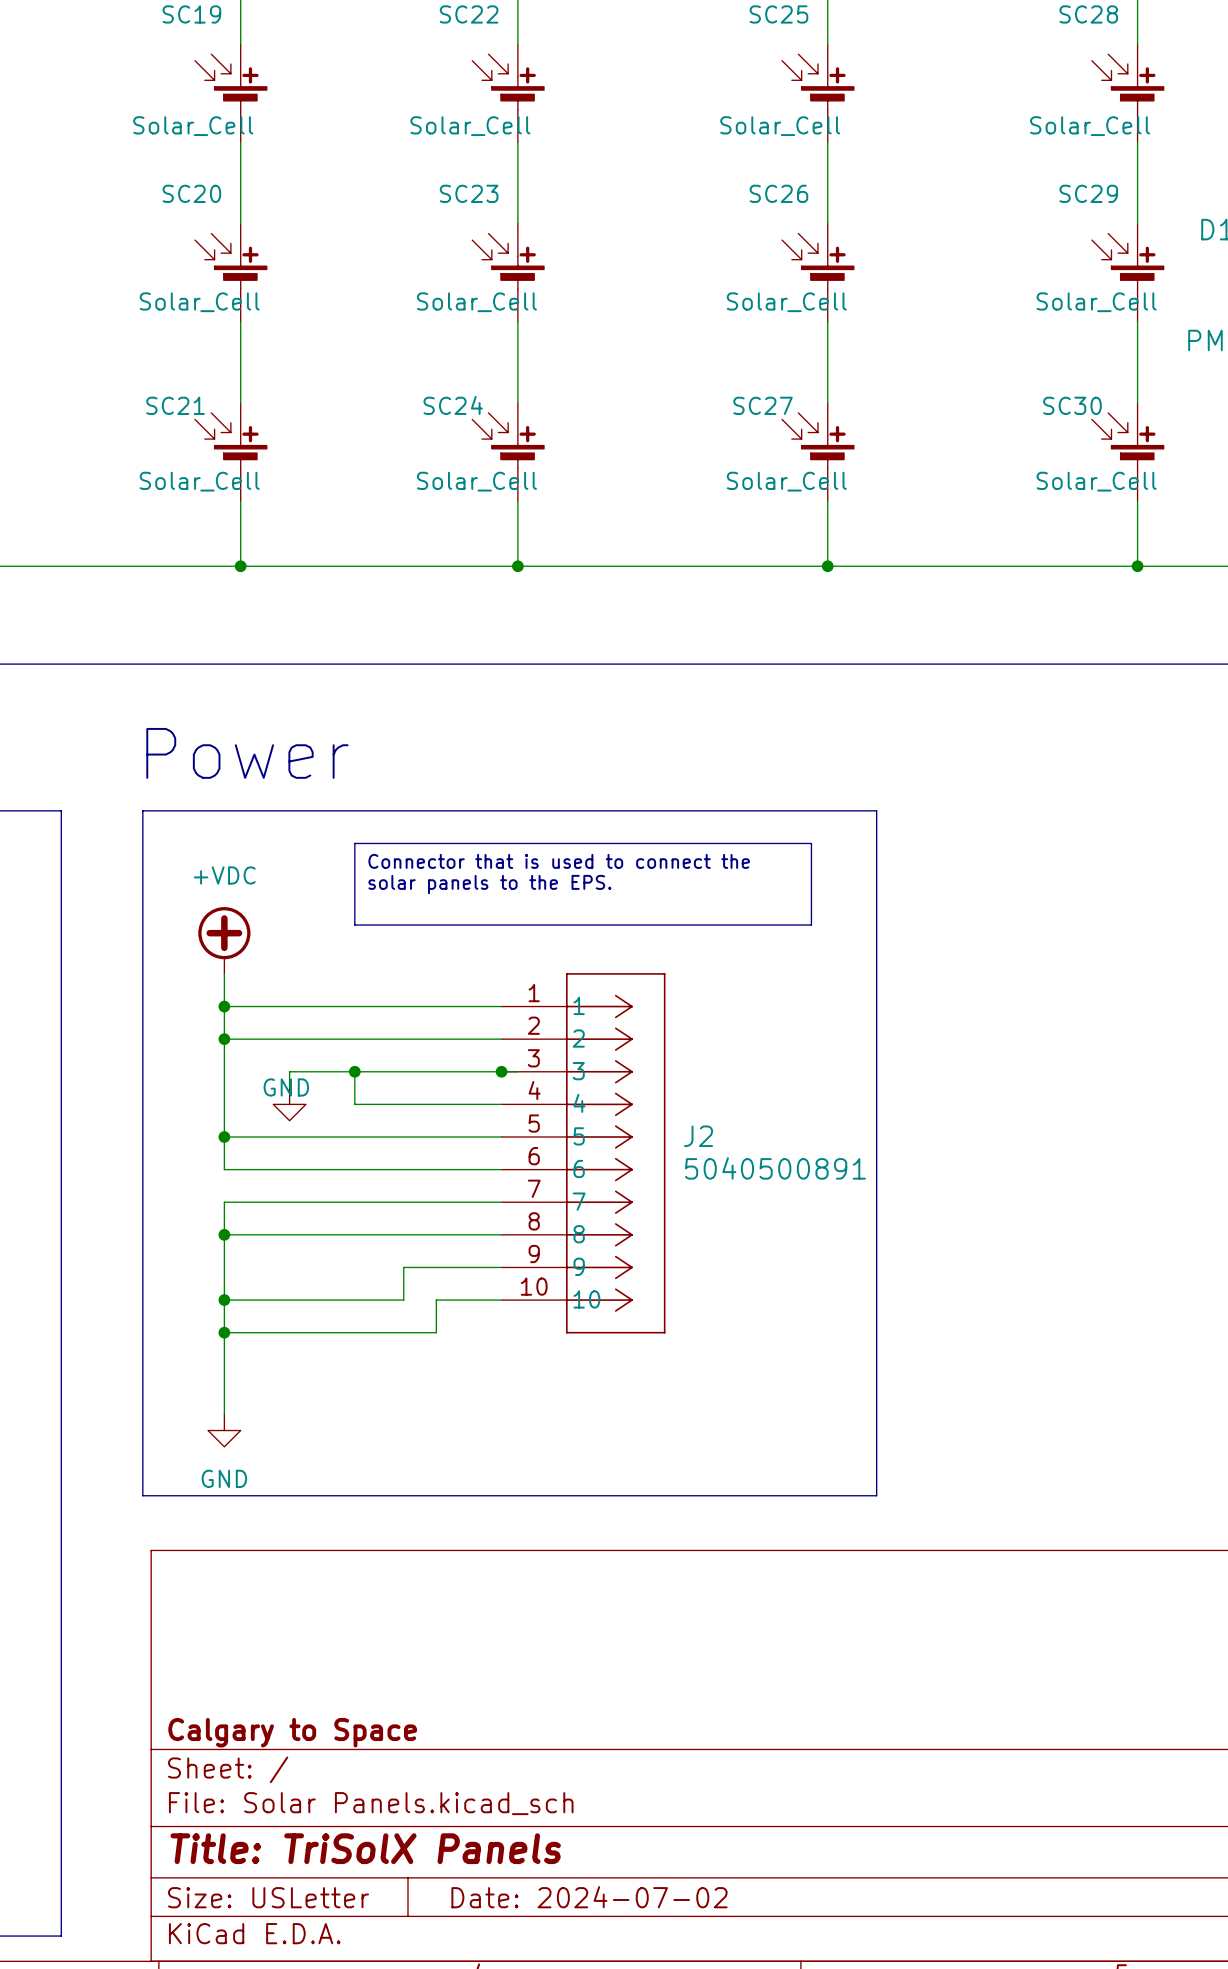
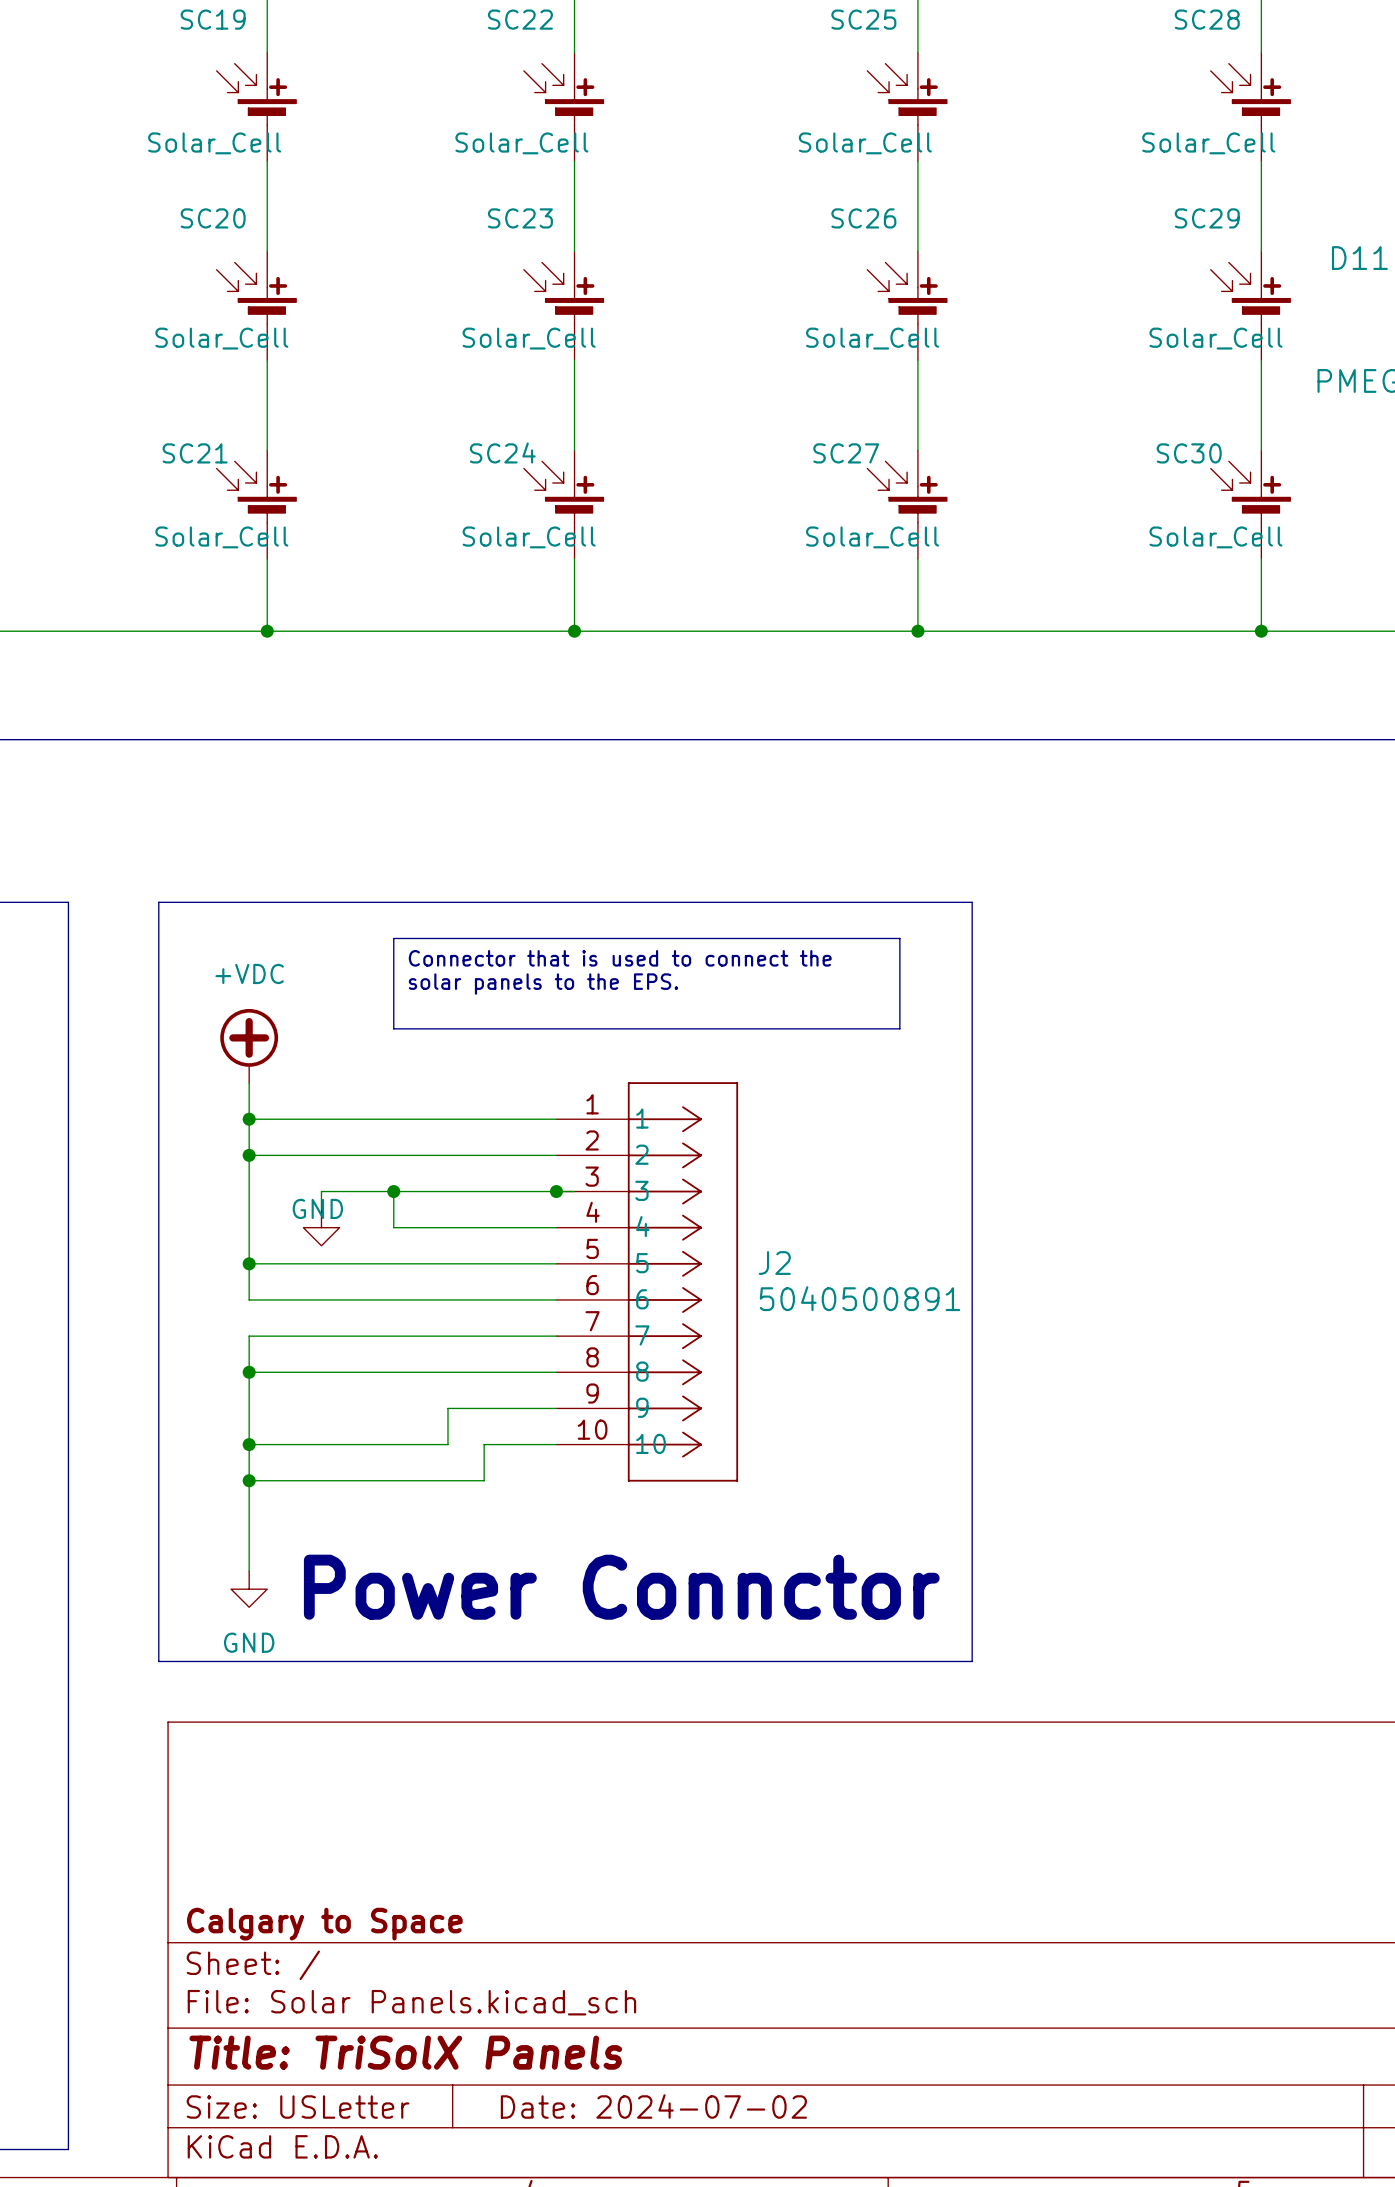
text: Power (247, 753) -> none
text: none -> Power Connctor (621, 1587)

